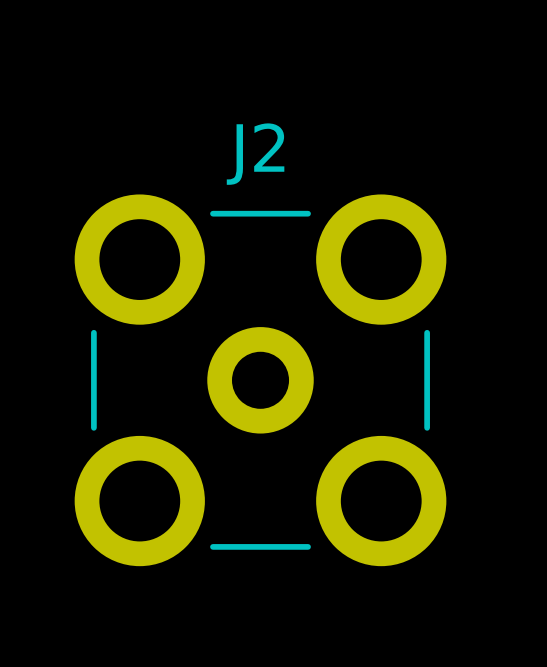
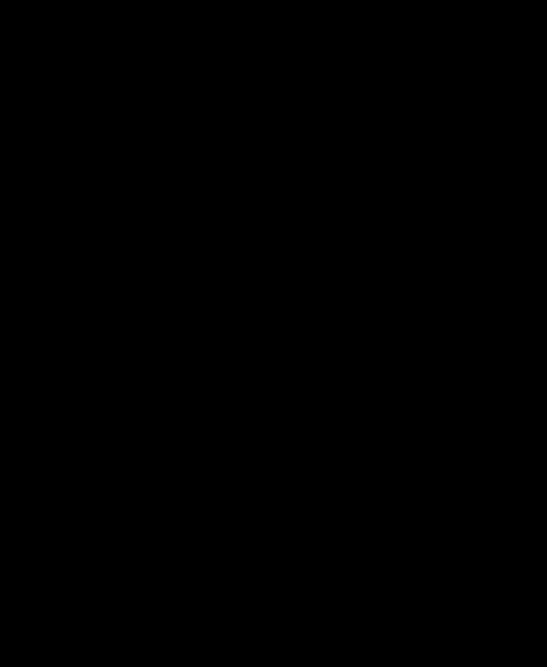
J2: (260, 380) -> none

